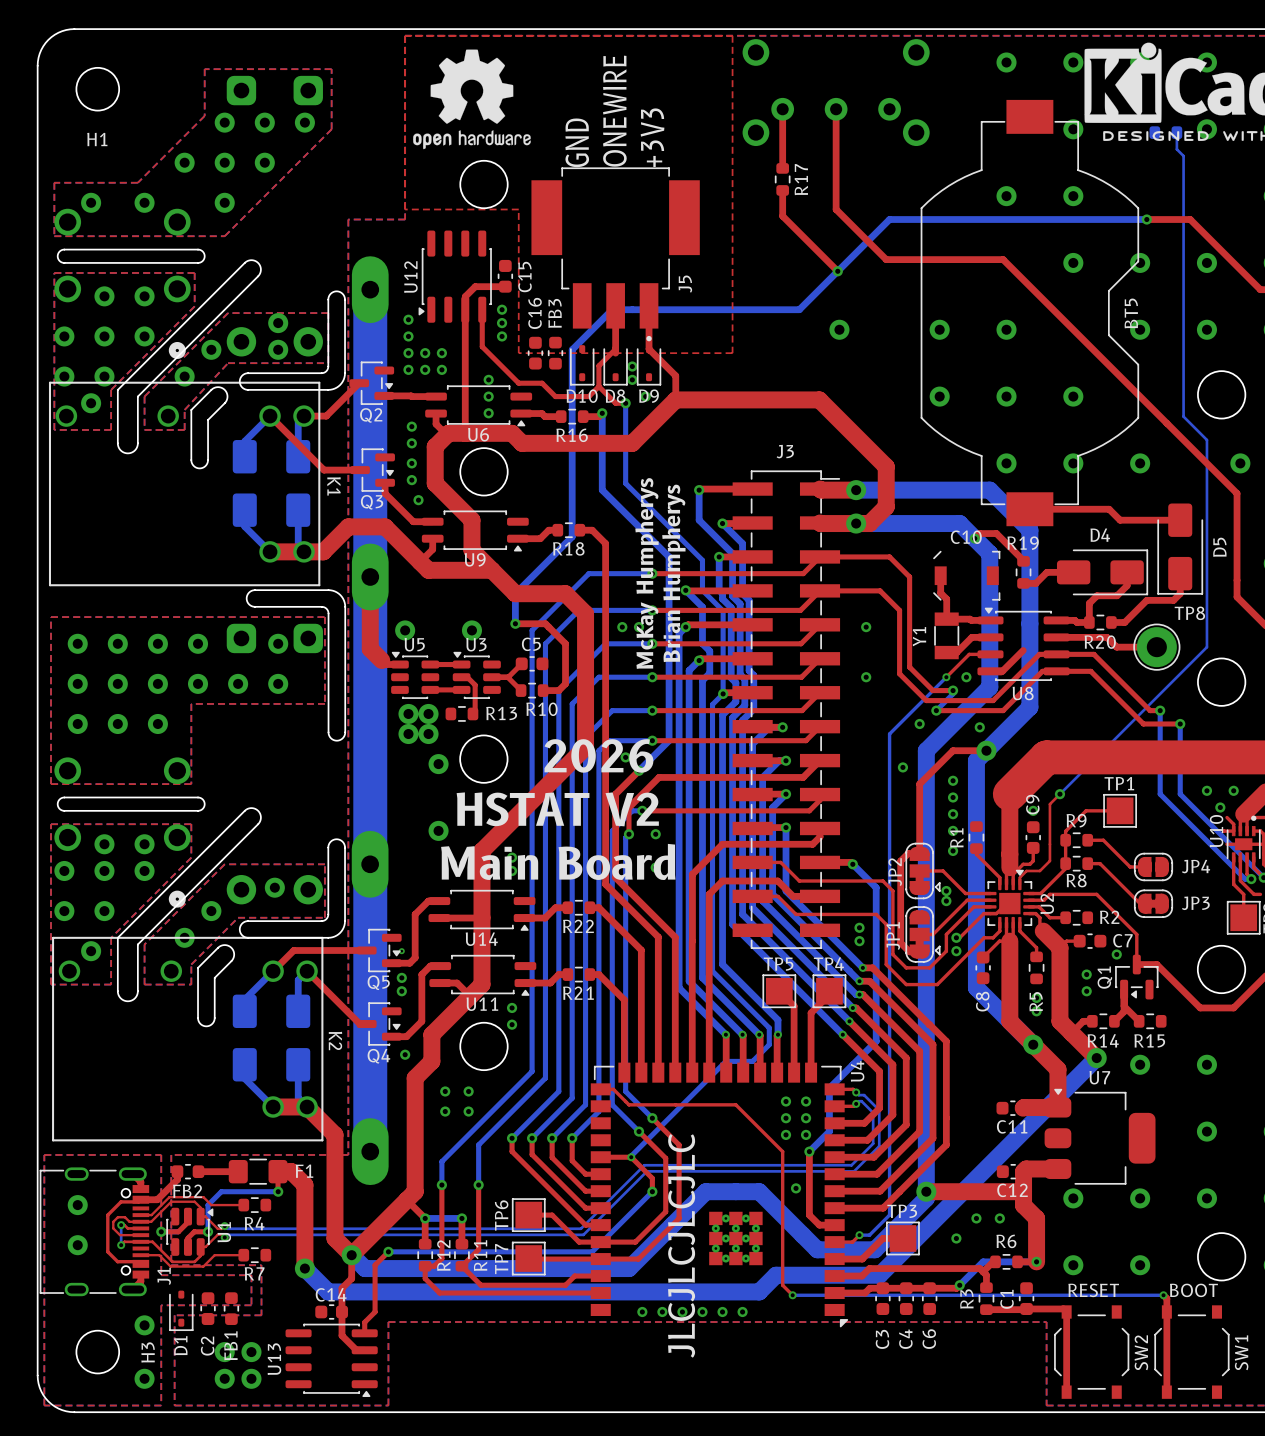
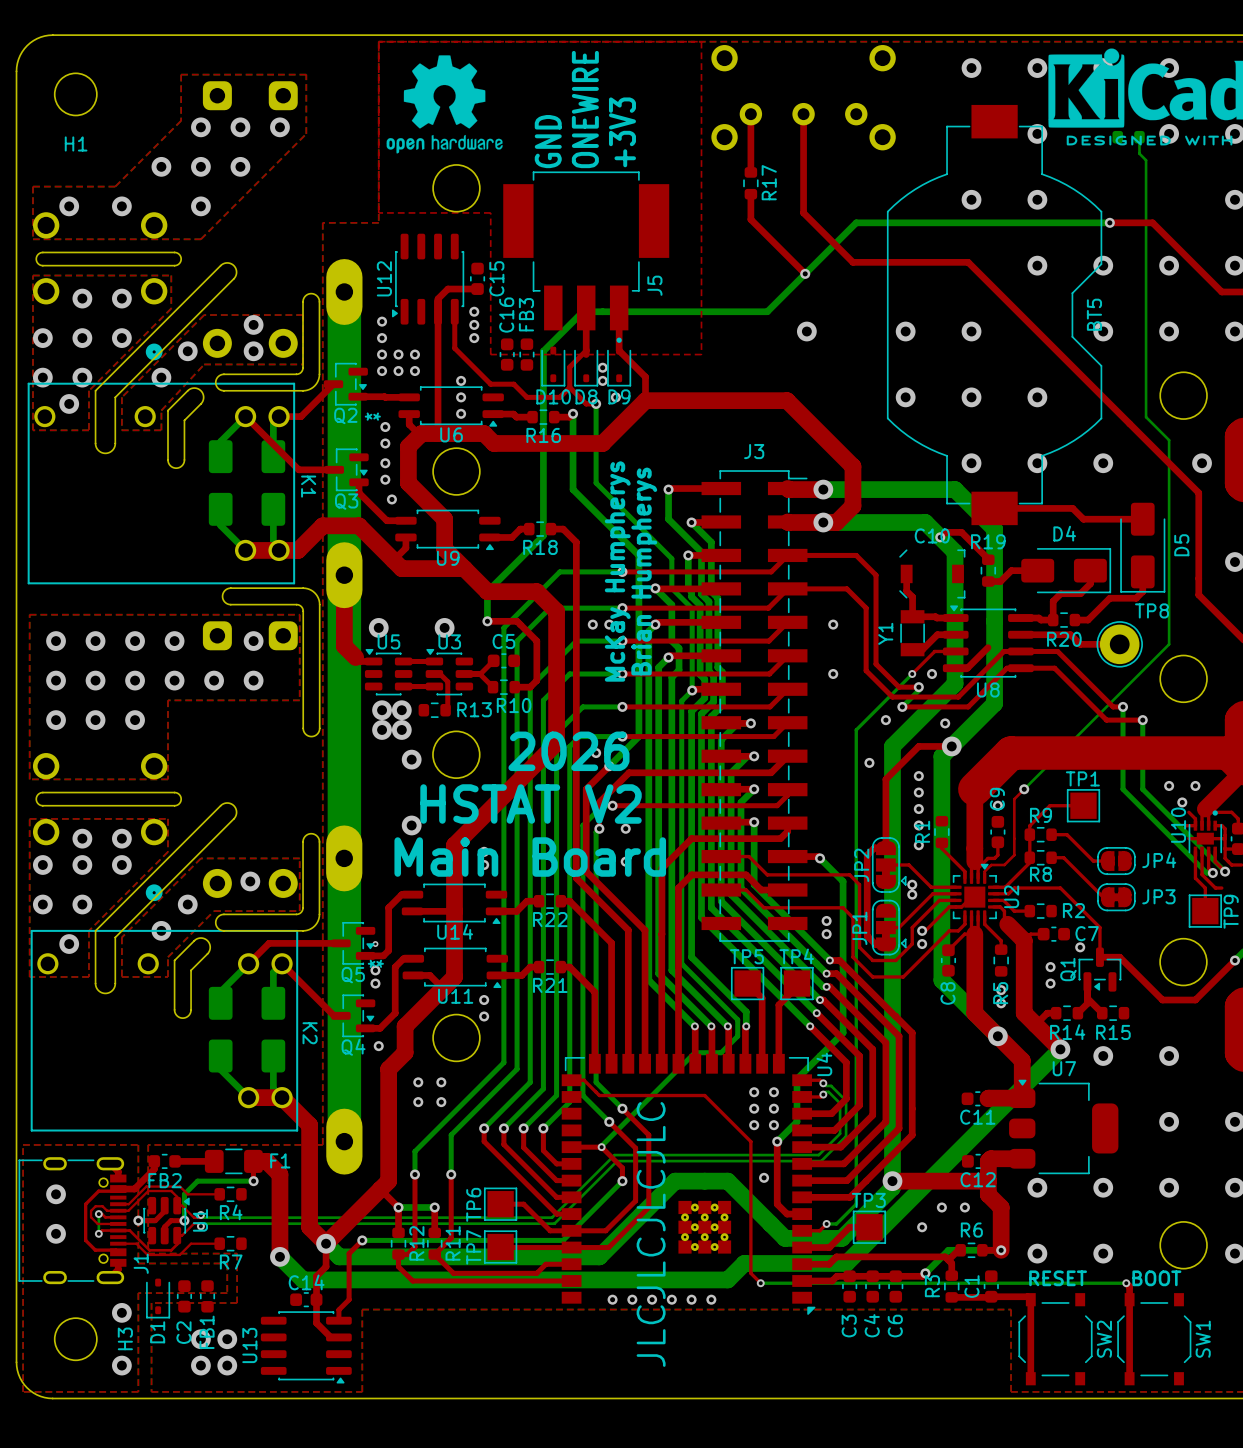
K1 footprint: [48, 381, 321, 587] -> [27, 382, 296, 585]
K2 footprint: [52, 936, 324, 1142] -> [30, 929, 299, 1132]

